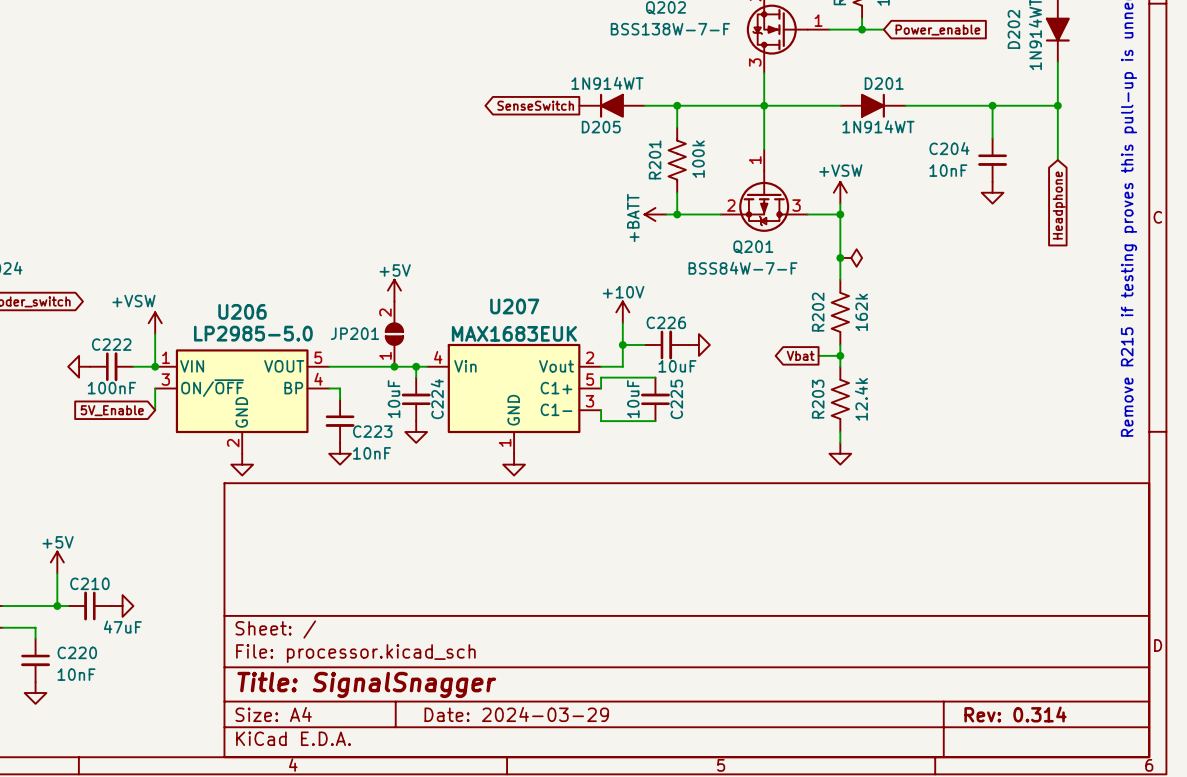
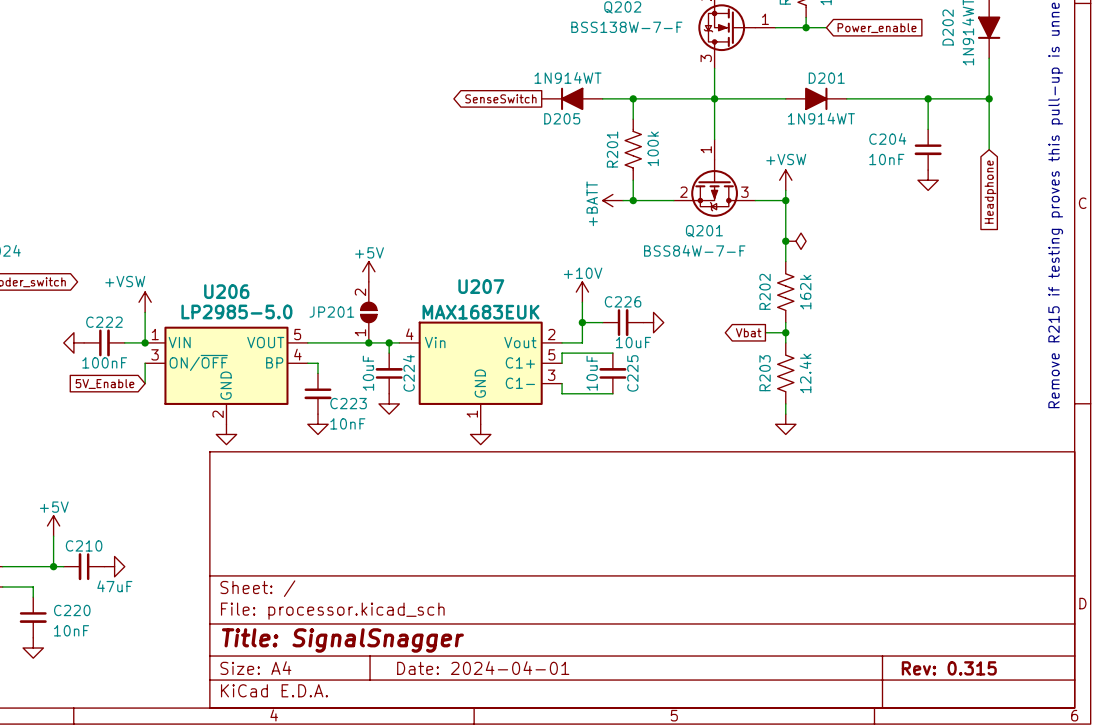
title block: Date: 2024-03-29 (516, 714) -> Date: 2024-04-01 (483, 668)
title block: Rev: 0.314 (1015, 714) -> Rev: 0.315 (949, 668)

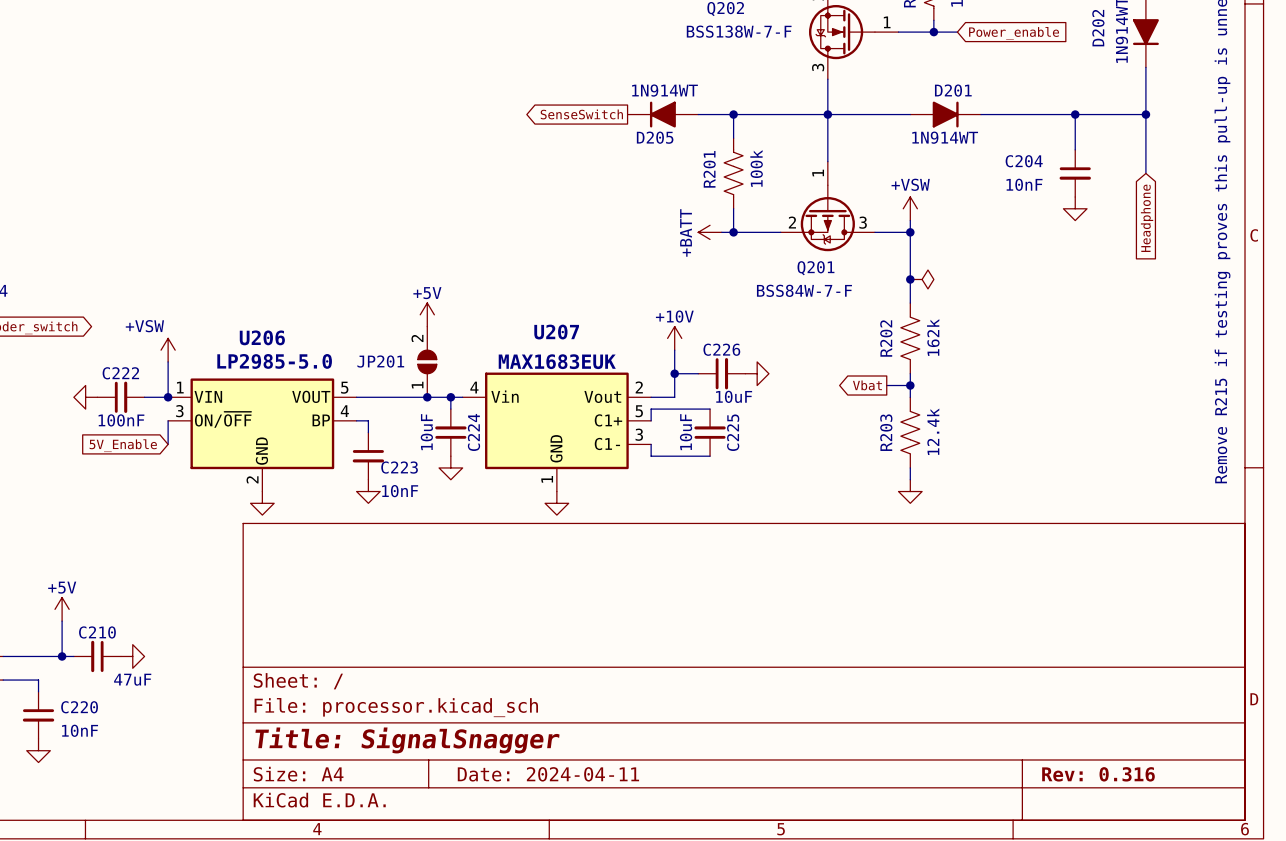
title block: Date: 2024-04-01 (483, 668) -> Date: 2024-04-11 (548, 774)
title block: Rev: 0.315 (949, 668) -> Rev: 0.316 (1098, 774)

